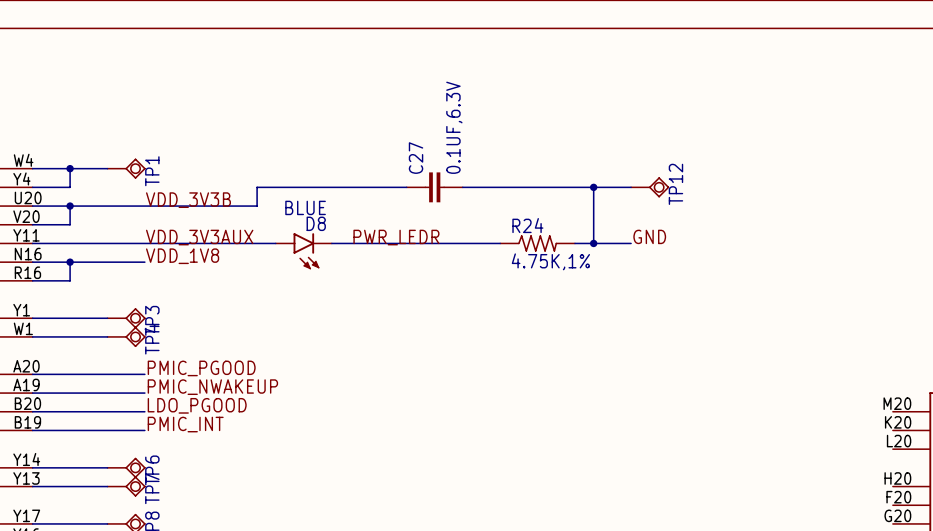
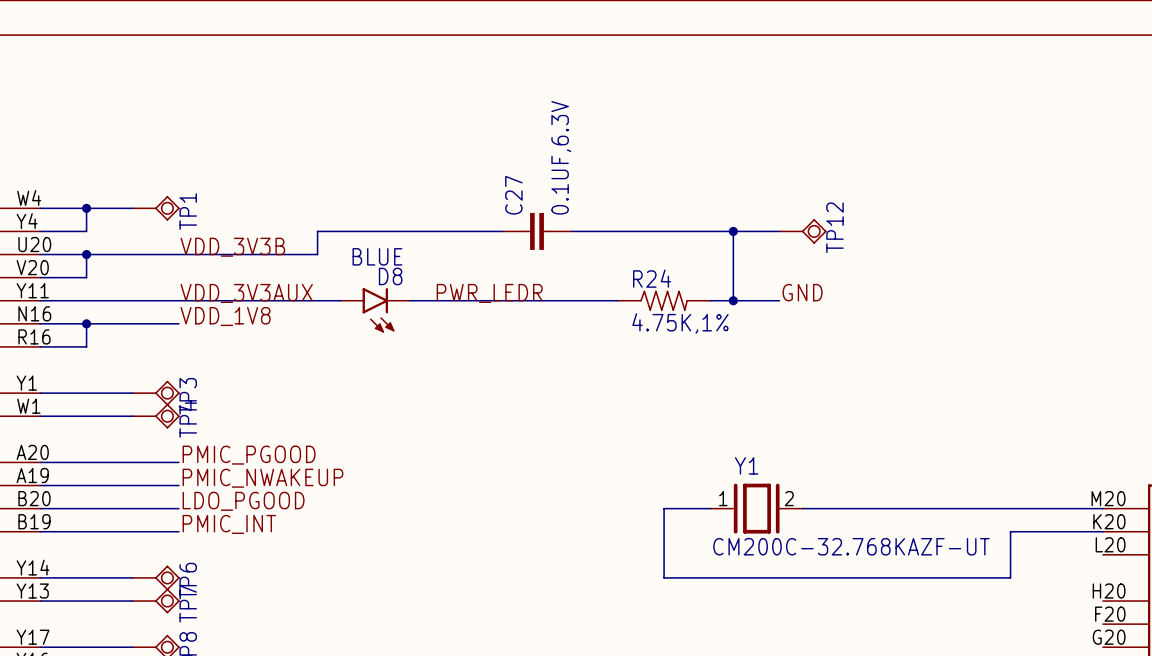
wire: none -> (710, 508) (664, 508) (664, 577) (1010, 577) (1010, 531) (1102, 531)
part: none -> CM200C-32.768KAZF-UT (756, 508)
wire: none -> (802, 508) (1102, 508)

